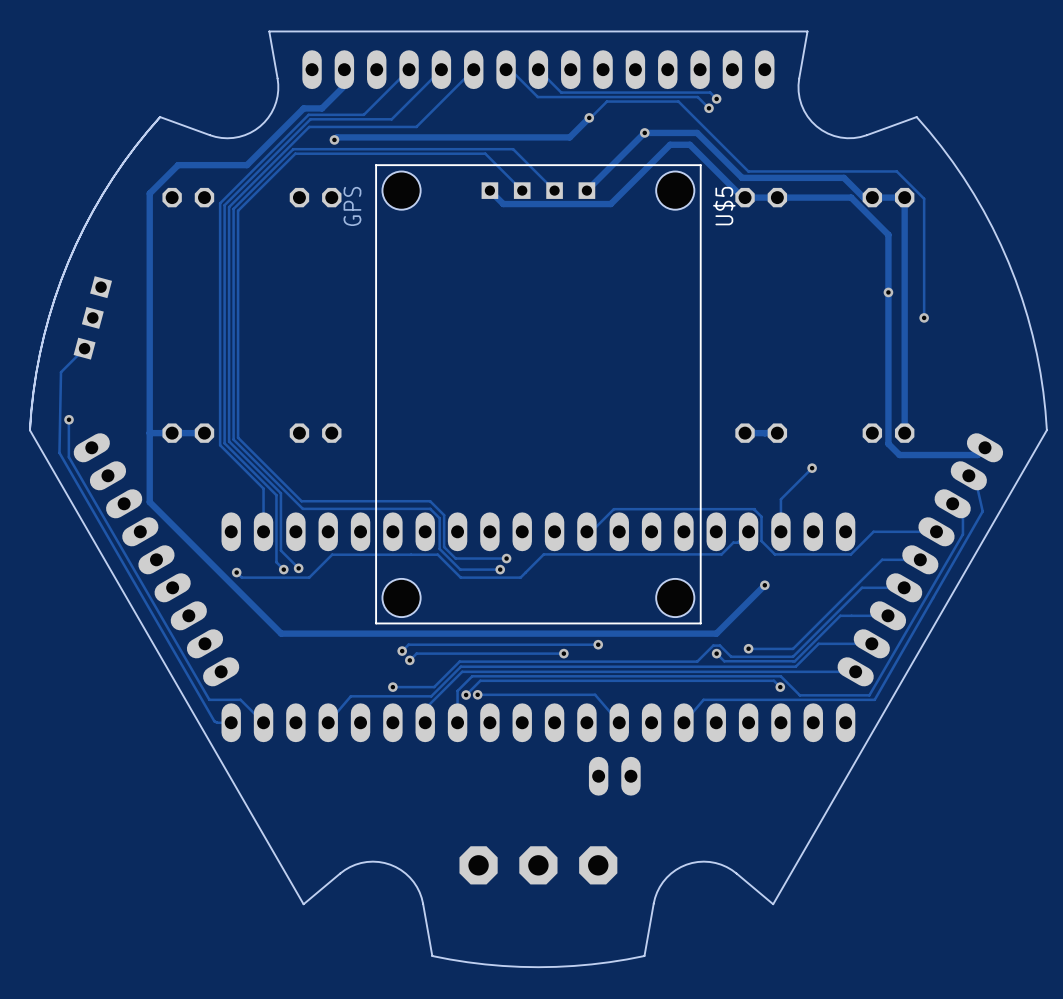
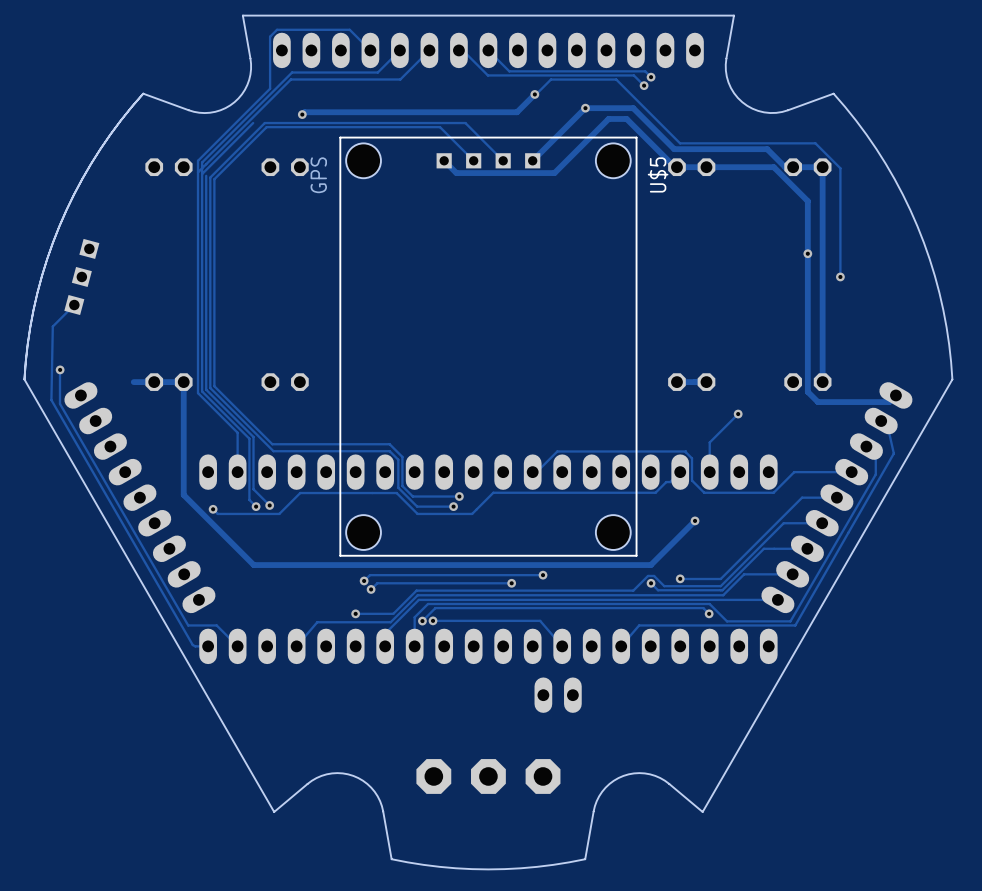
track: (344, 69) (344, 86) (321, 108) (303, 108) (246, 165) (178, 165) (149, 193) (149, 502) (204, 556) -> (183, 382) (183, 495)
track: (409, 69) (363, 114) (308, 114) -> (400, 79) (290, 79) (278, 91)
track: none -> (370, 50) (349, 29) (277, 29) (270, 36) (270, 88) (198, 160) (198, 172)
track: (417, 93) (391, 119) (310, 119) (280, 149) -> (377, 72) (292, 72) (202, 162) (202, 174)
track: (441, 101) (416, 126) (309, 126) (229, 207) -> none

